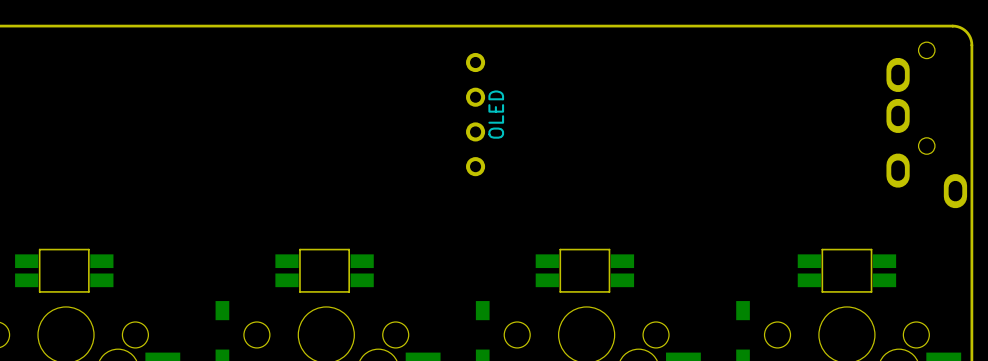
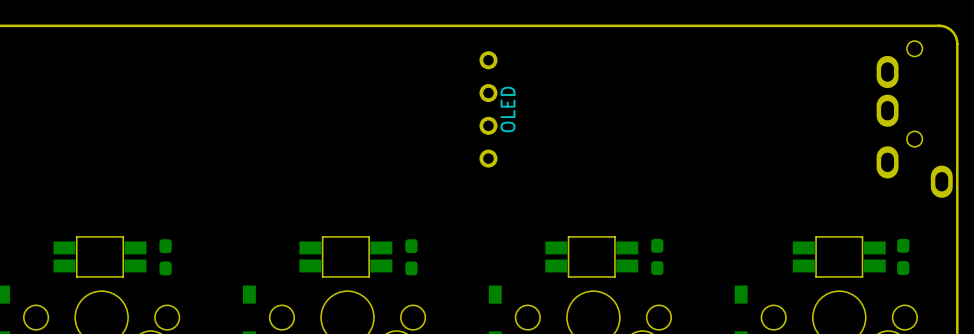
part: none -> (657, 256)
part: none -> (903, 256)
part: none -> (165, 257)
part: none -> (411, 257)

